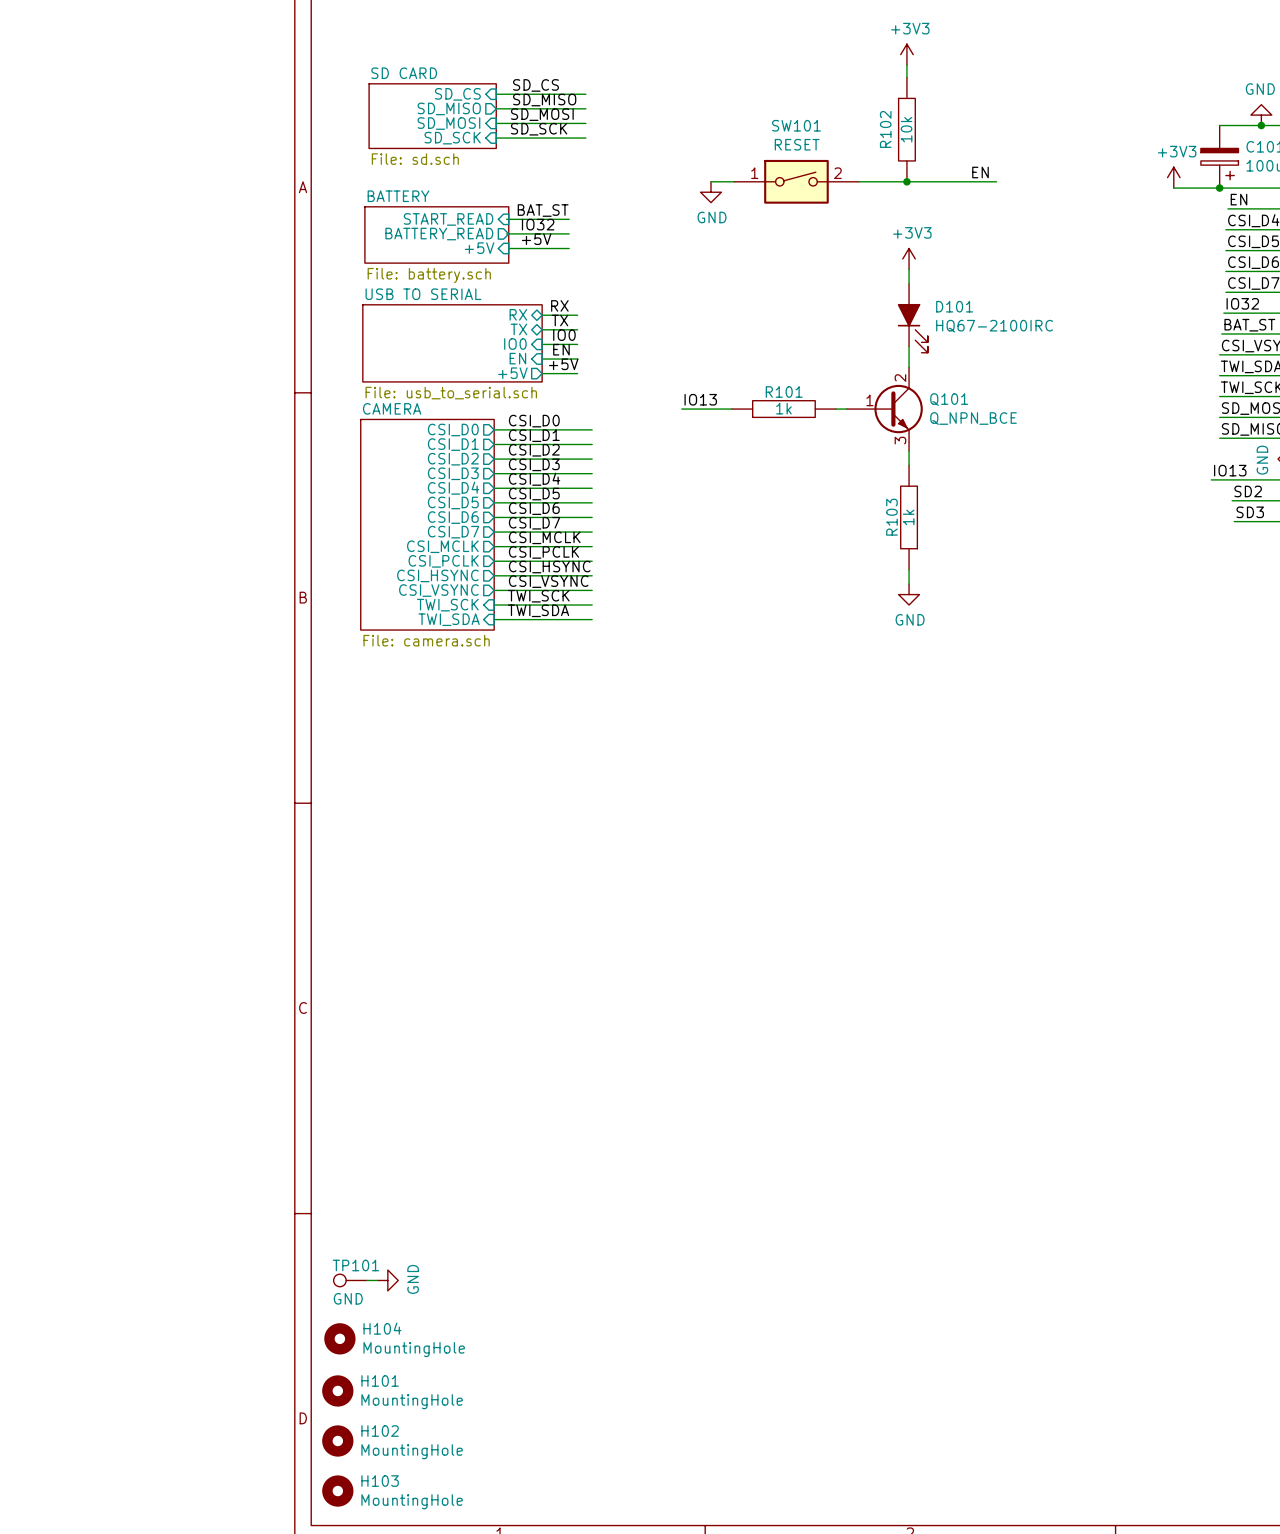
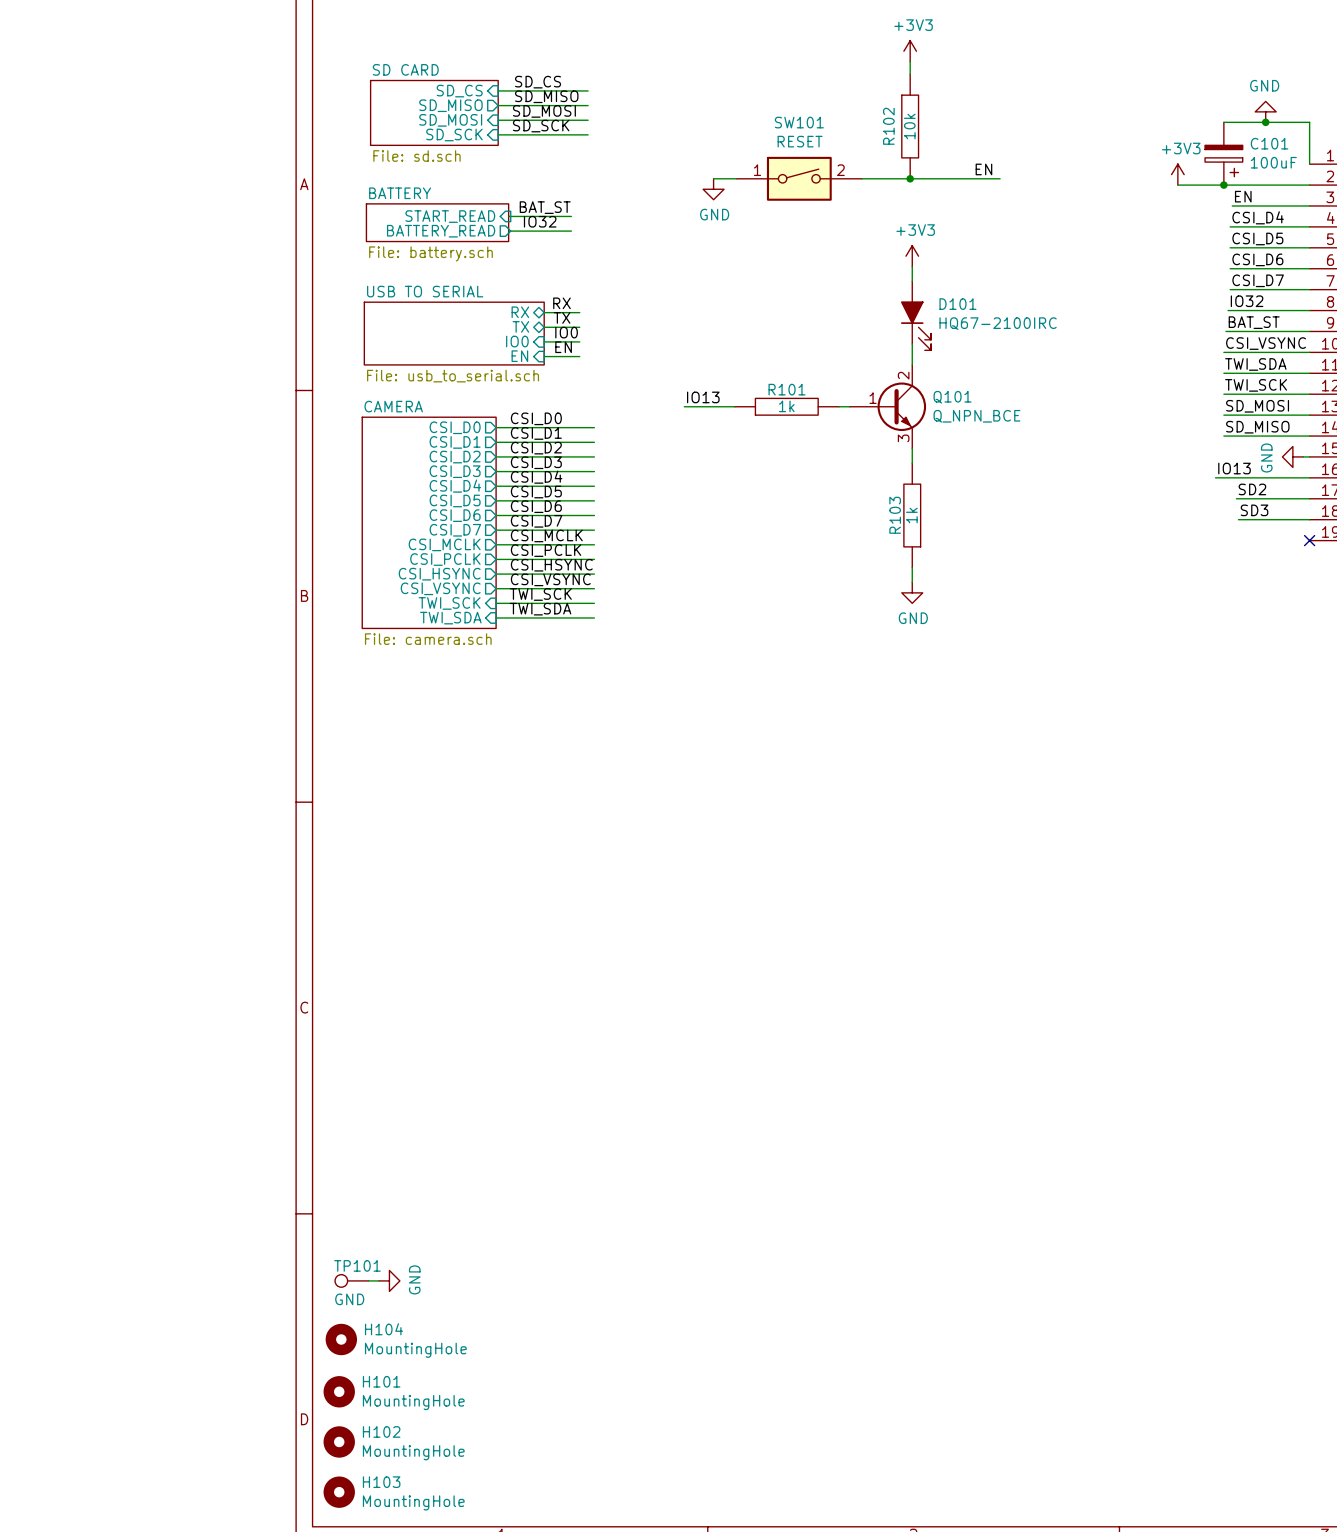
sheet BATTERY: none -> File: battery.sch (437, 222)
sheet BATTERY: File: battery.sch (436, 234) -> none
label: +5V (536, 239) -> none
sheet pin: +5V (479, 248) -> none
wire: (508, 248) (569, 248) -> none
sheet USB TO SERIAL shape: [362, 304, 543, 382] -> [364, 302, 545, 365]
label: +5V (563, 364) -> none
sheet pin: +5V (512, 373) -> none
wire: (542, 373) (577, 373) -> none

